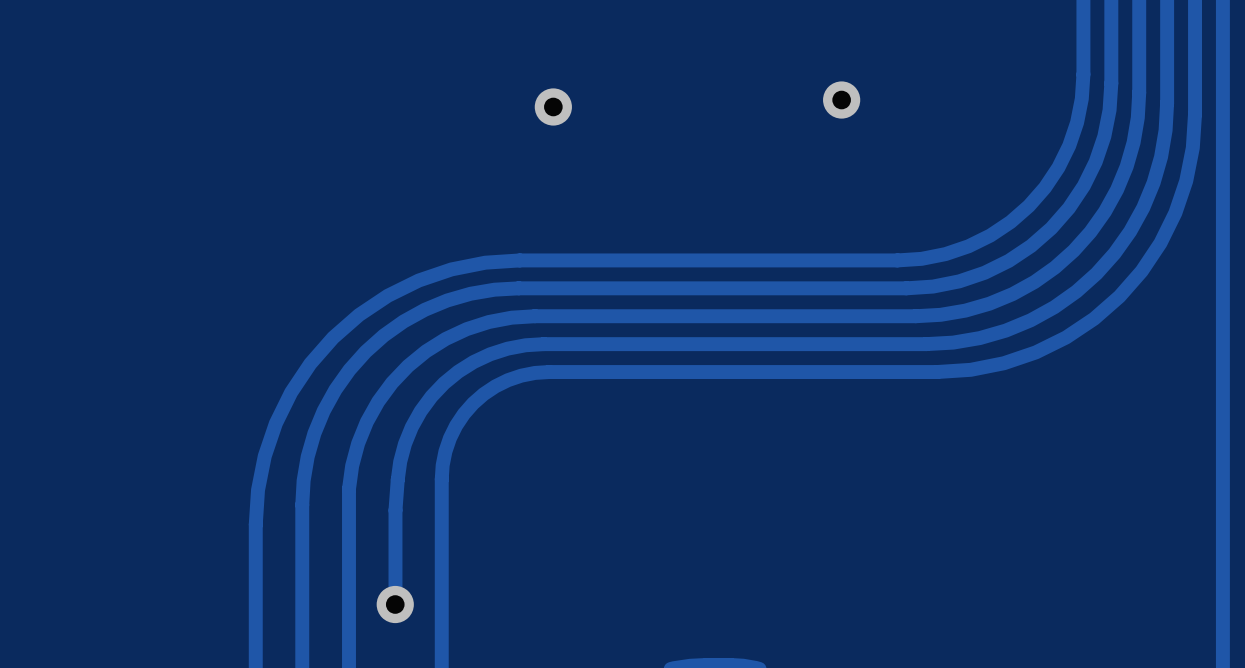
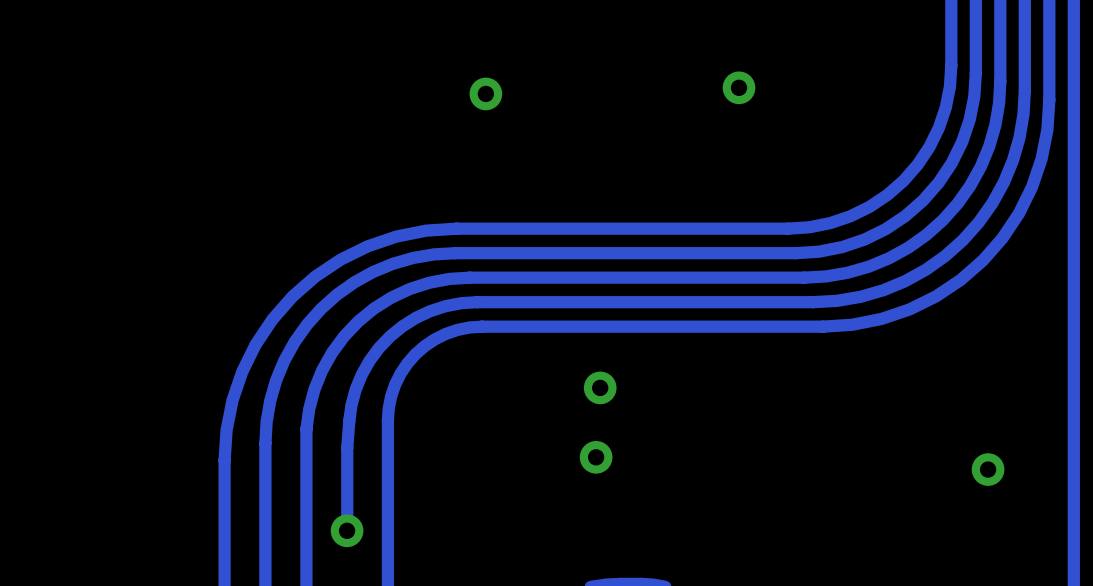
via: none -> (600, 387)
via: none -> (596, 457)
via: none -> (988, 469)

